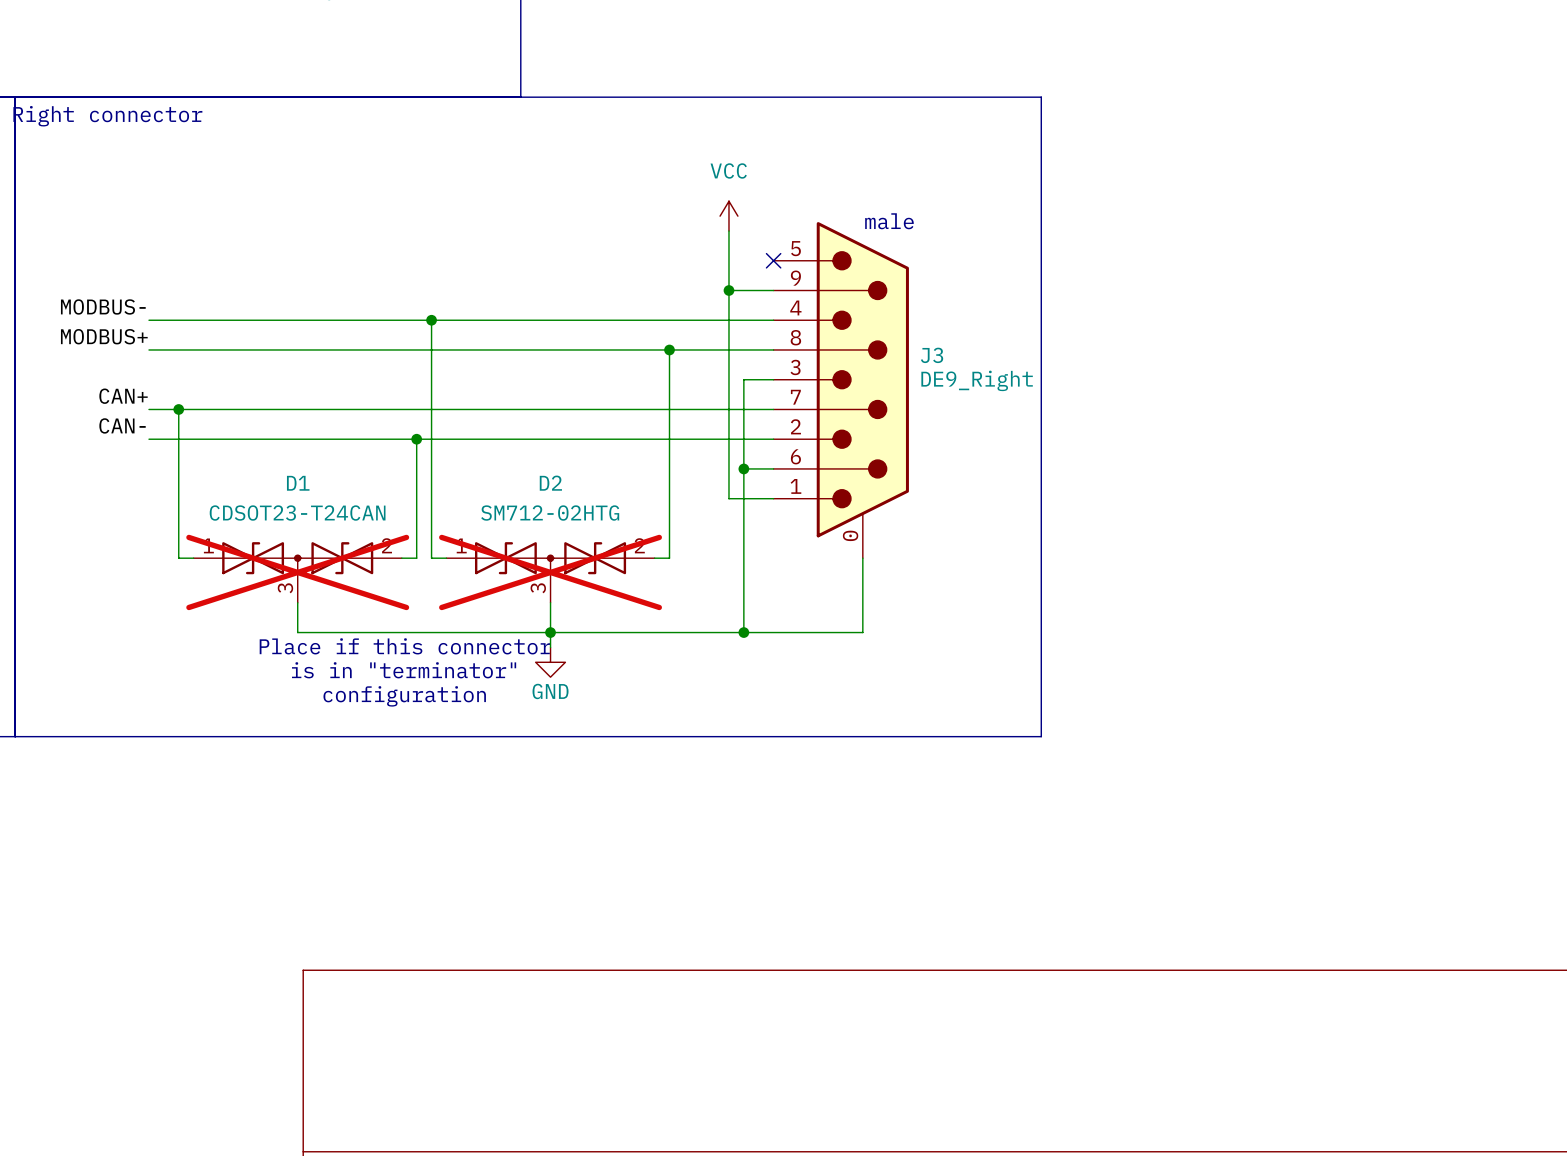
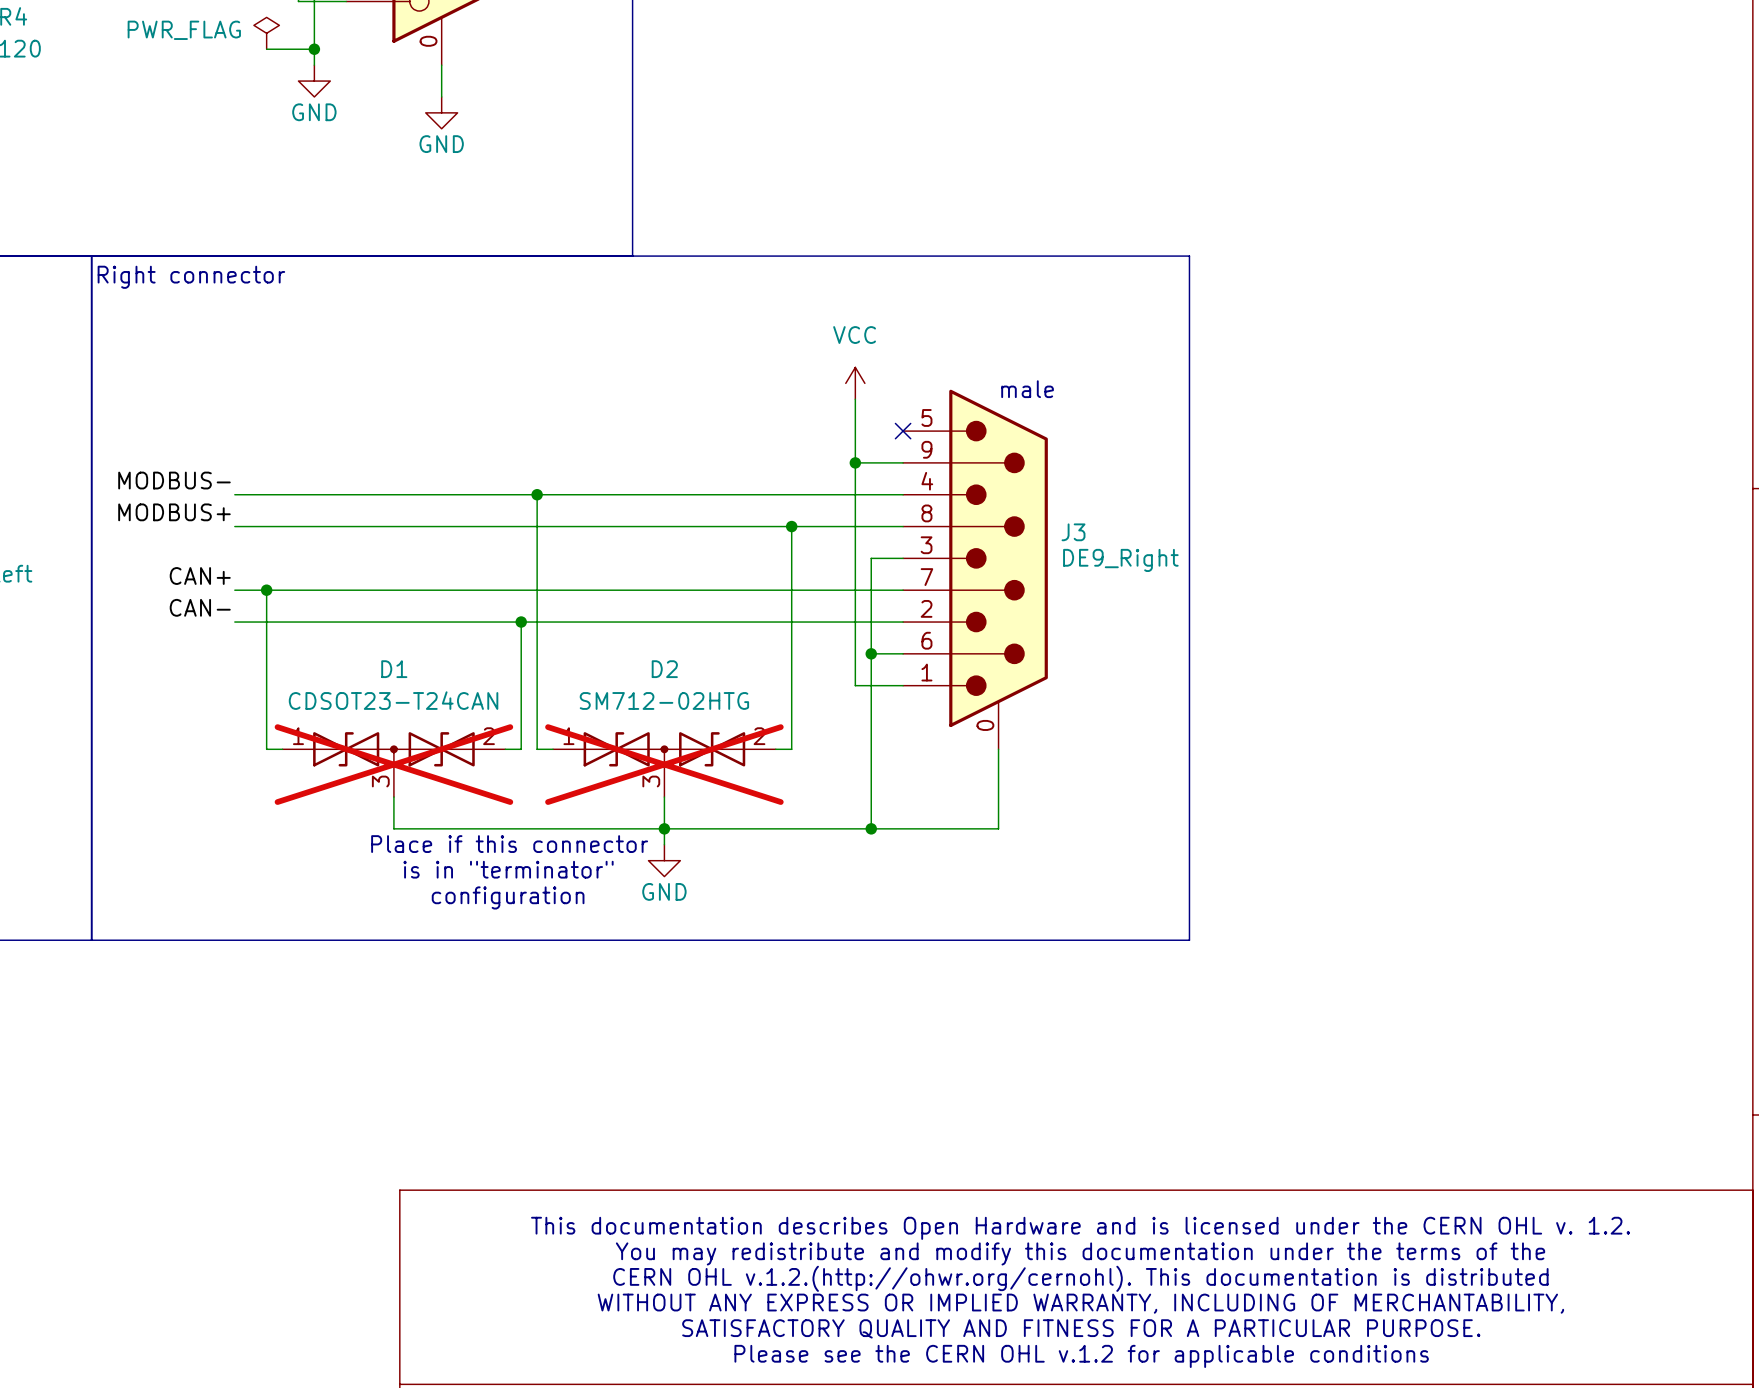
text: none -> This documentation describes Open Hardware and is licensed under the CERN OHL v. 1.2. (1080, 1228)
text: none -> You may redistribute and modify this documentation under the terms of the (1080, 1253)
text: none -> CERN OHL v.1.2.(http://ohwr.org/cernohl). This documentation is distributed (1080, 1278)
text: none -> WITHOUT ANY EXPRESS OR IMPLIED WARRANTY, INCLUDING OF MERCHANTABILITY, (1080, 1303)
text: none -> SATISFACTORY QUALITY AND FITNESS FOR A PARTICULAR PURPOSE. (1081, 1328)
text: none -> Please see the CERN OHL v.1.2 for applicable conditions (1081, 1356)

